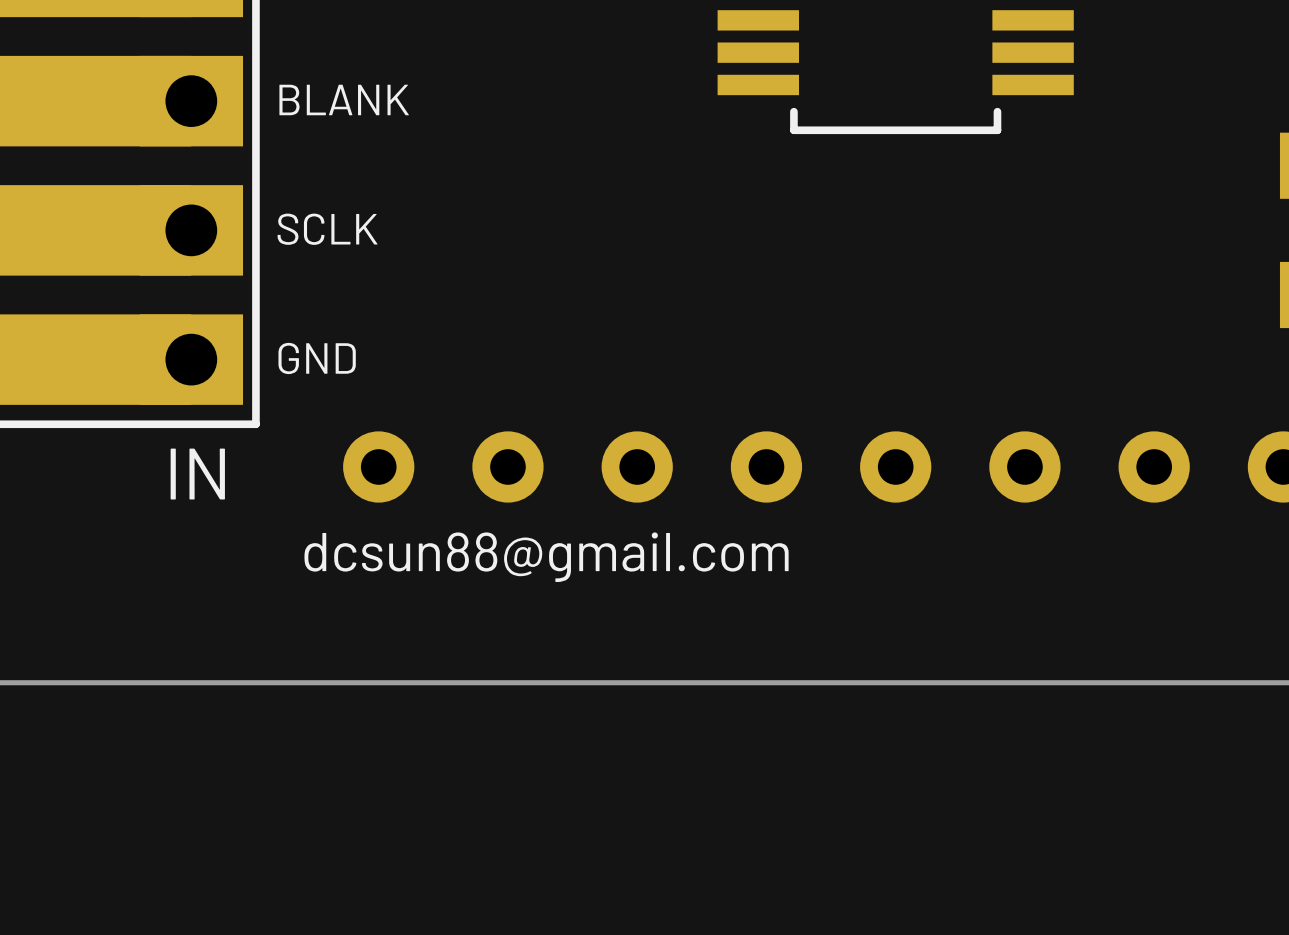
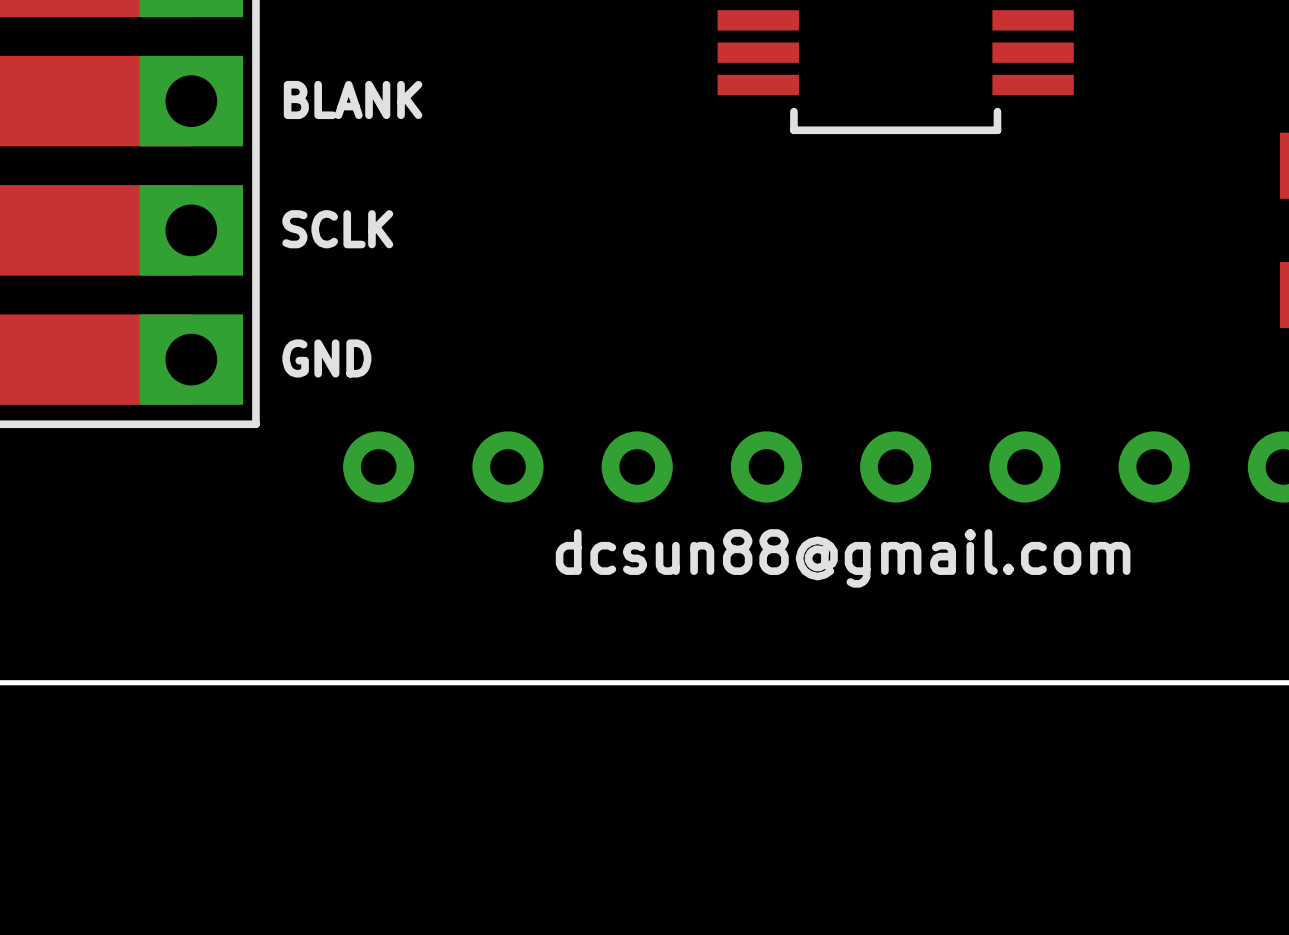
text: IN (197, 474) -> none
text position: dcsun88@gmail.com (546, 557) -> dcsun88@gmail.com (843, 558)

